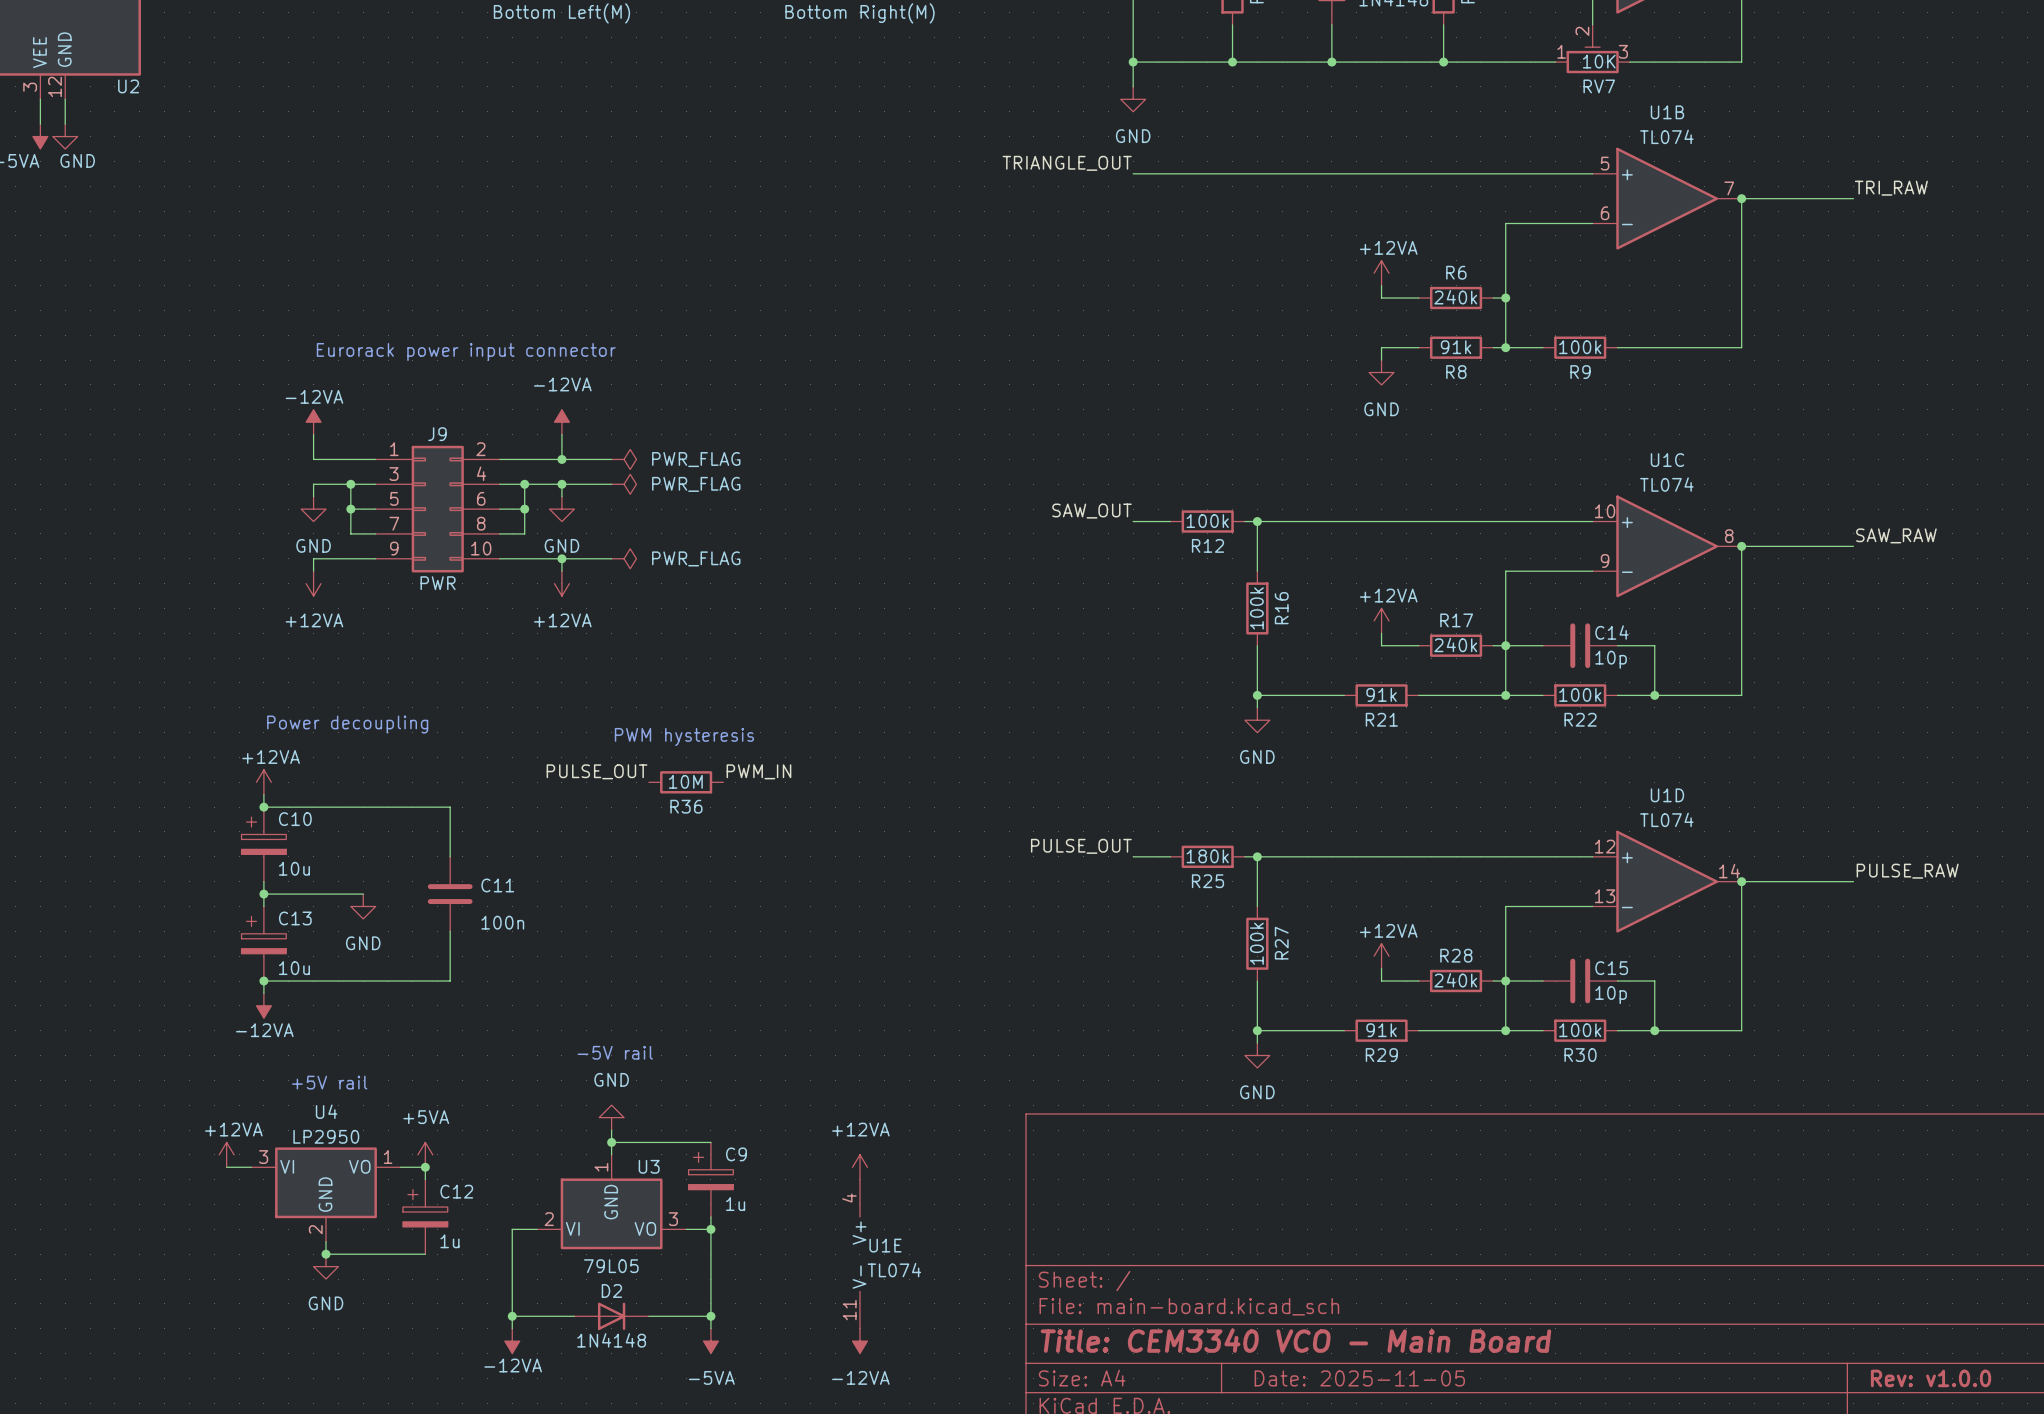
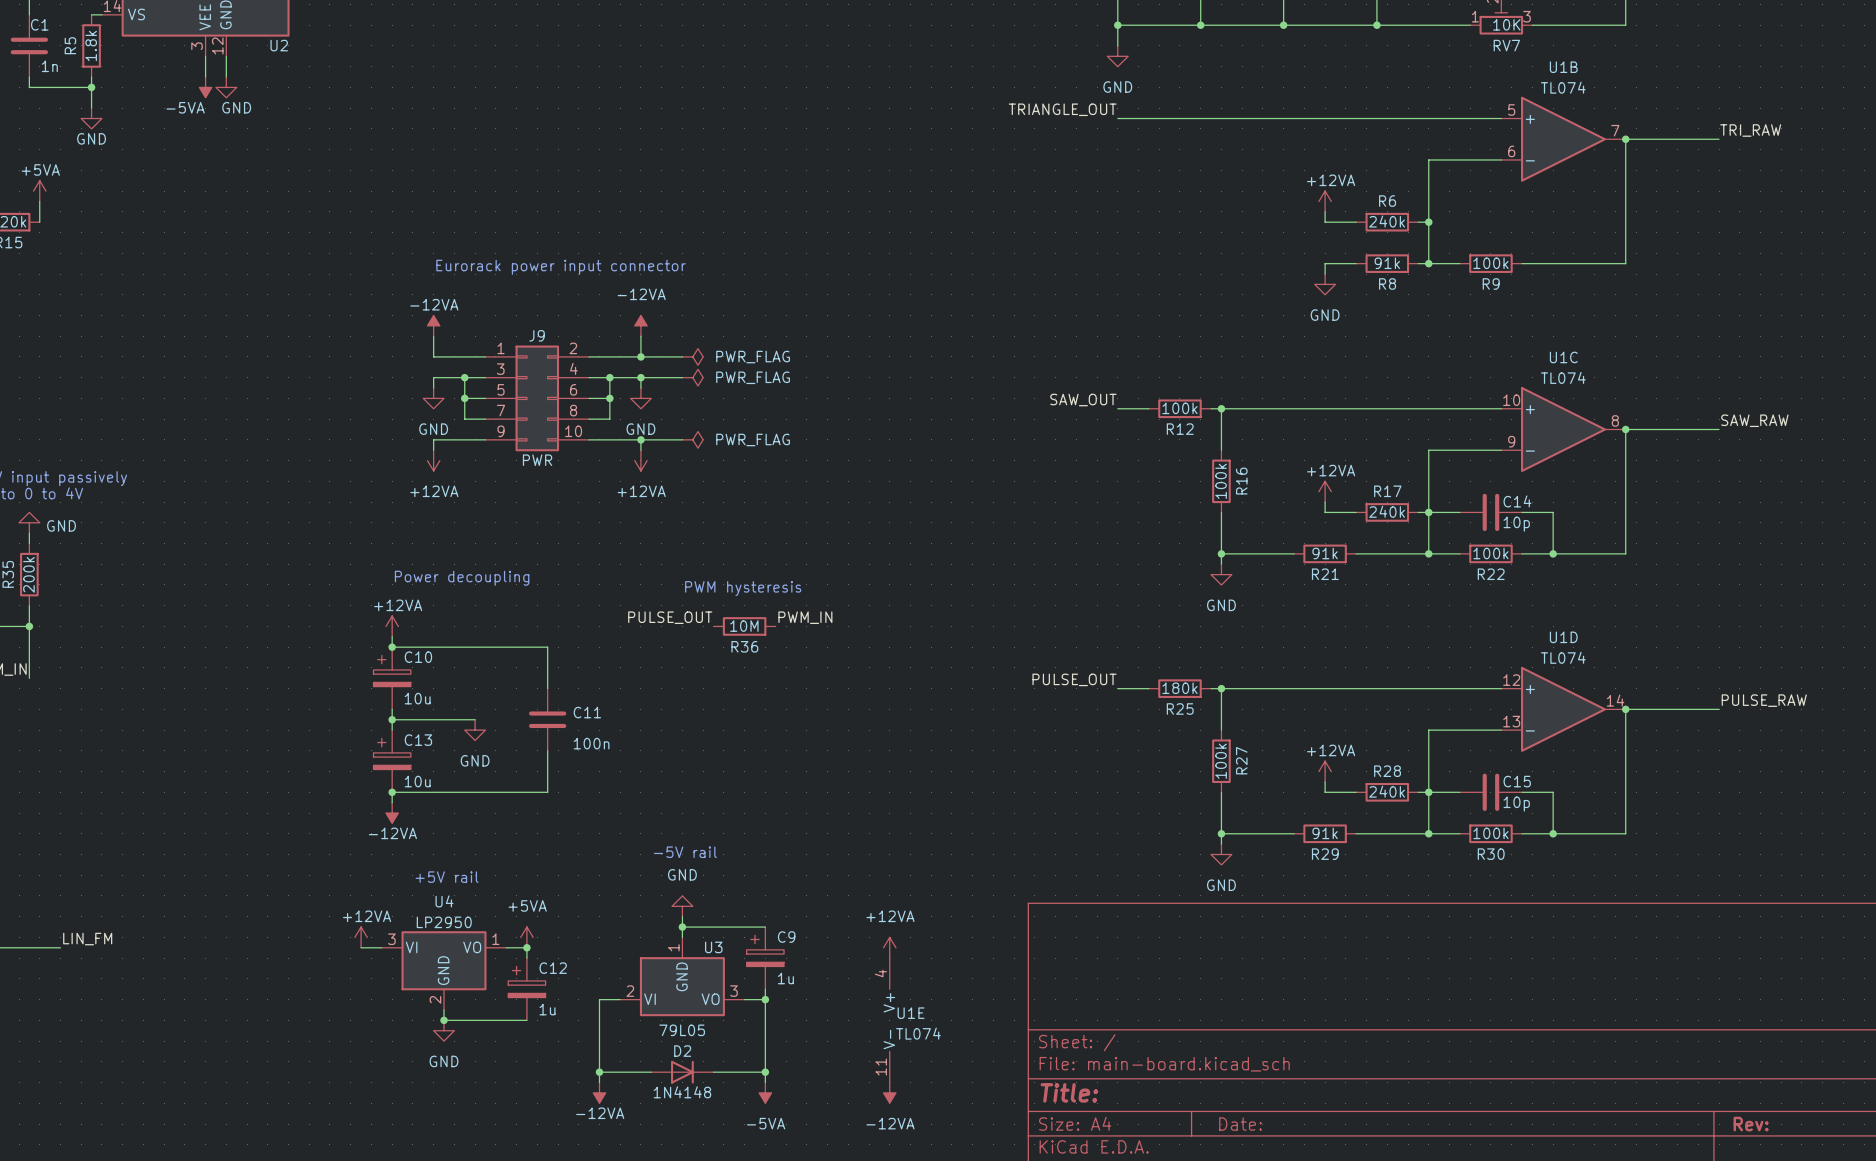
title block: Title: CEM3340 VCO - Main Board (1295, 1340) -> Title: (1069, 1092)
title block: Date: 2025-11-05 (1359, 1378) -> Date: (1240, 1124)
title block: Rev: v1.0.0 (1931, 1378) -> Rev: (1751, 1124)

